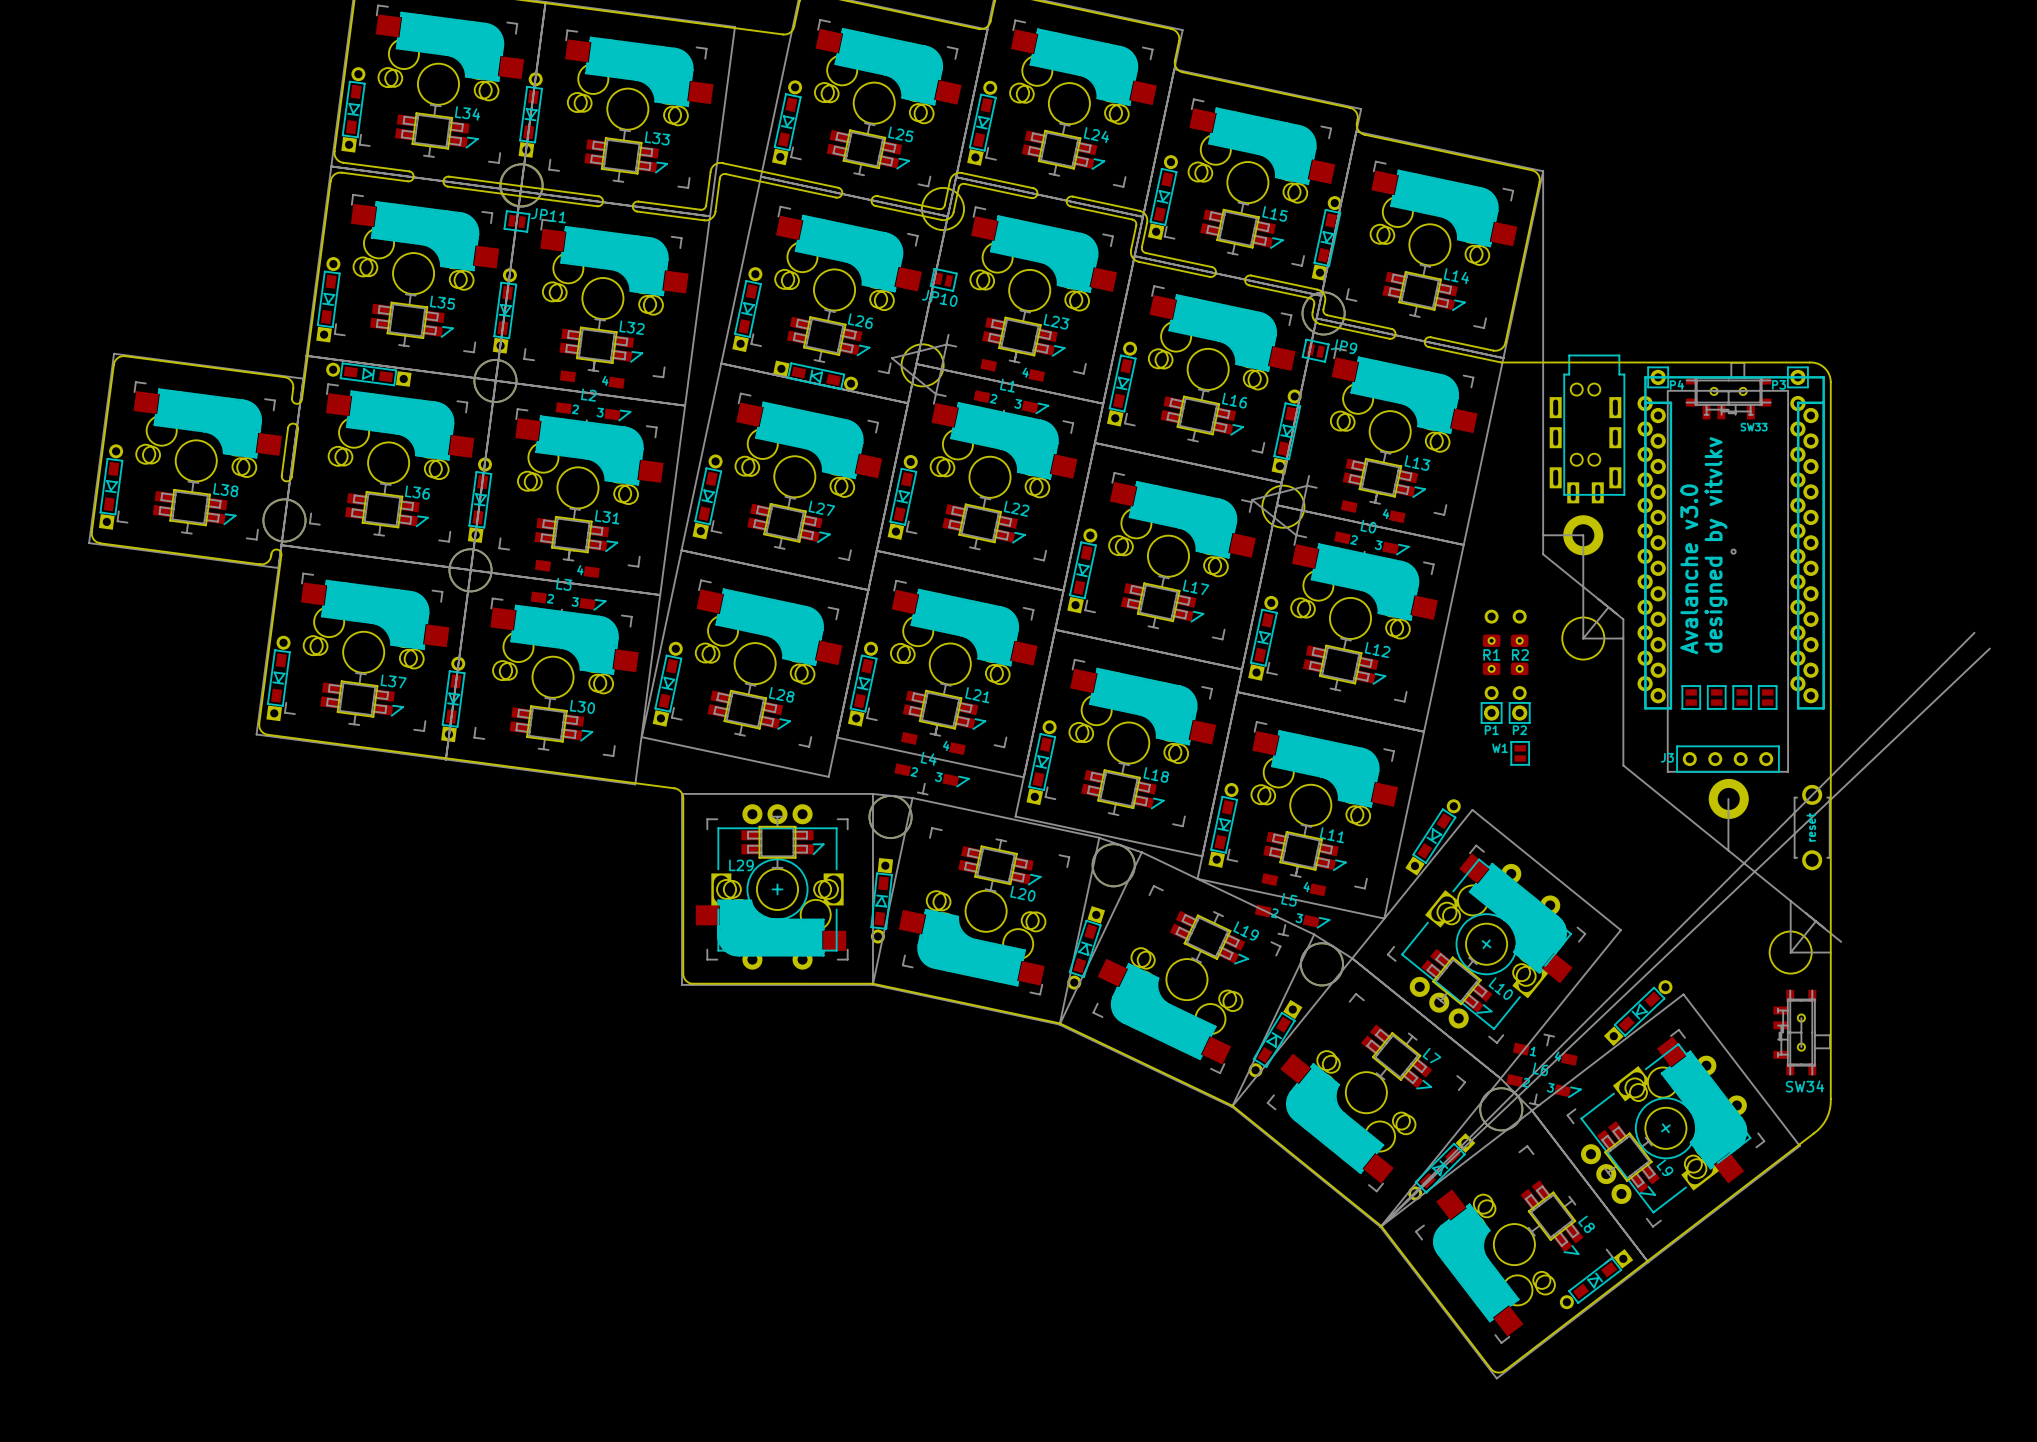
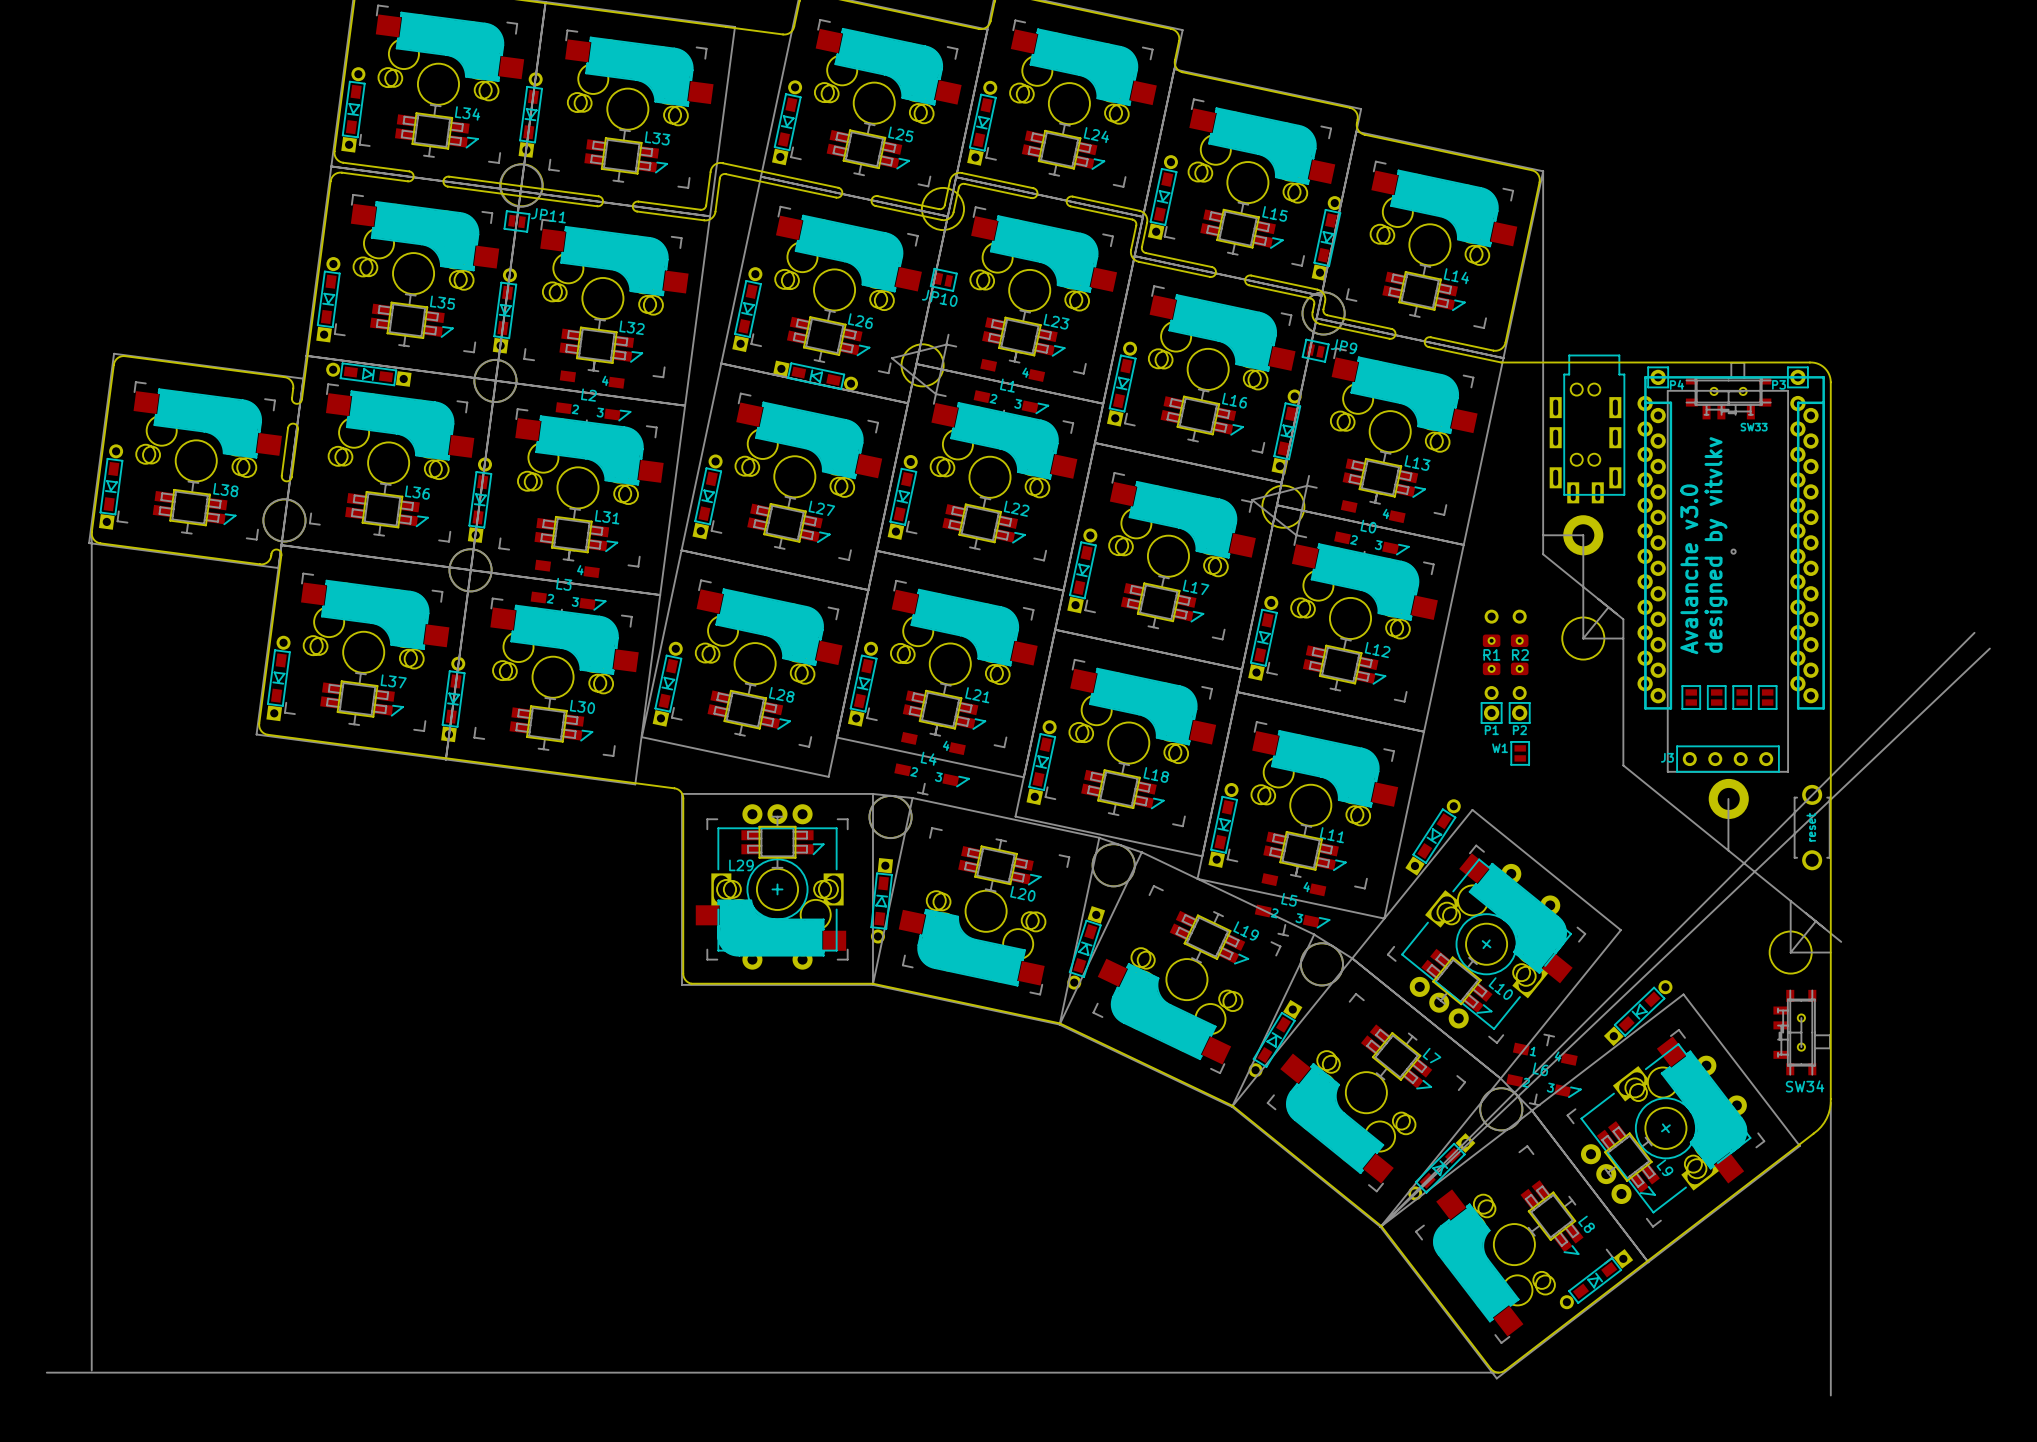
line: none -> (91, 533) (91, 1370)
line: none -> (1830, 1102) (1830, 1395)
line: none -> (46, 1372) (1498, 1372)

